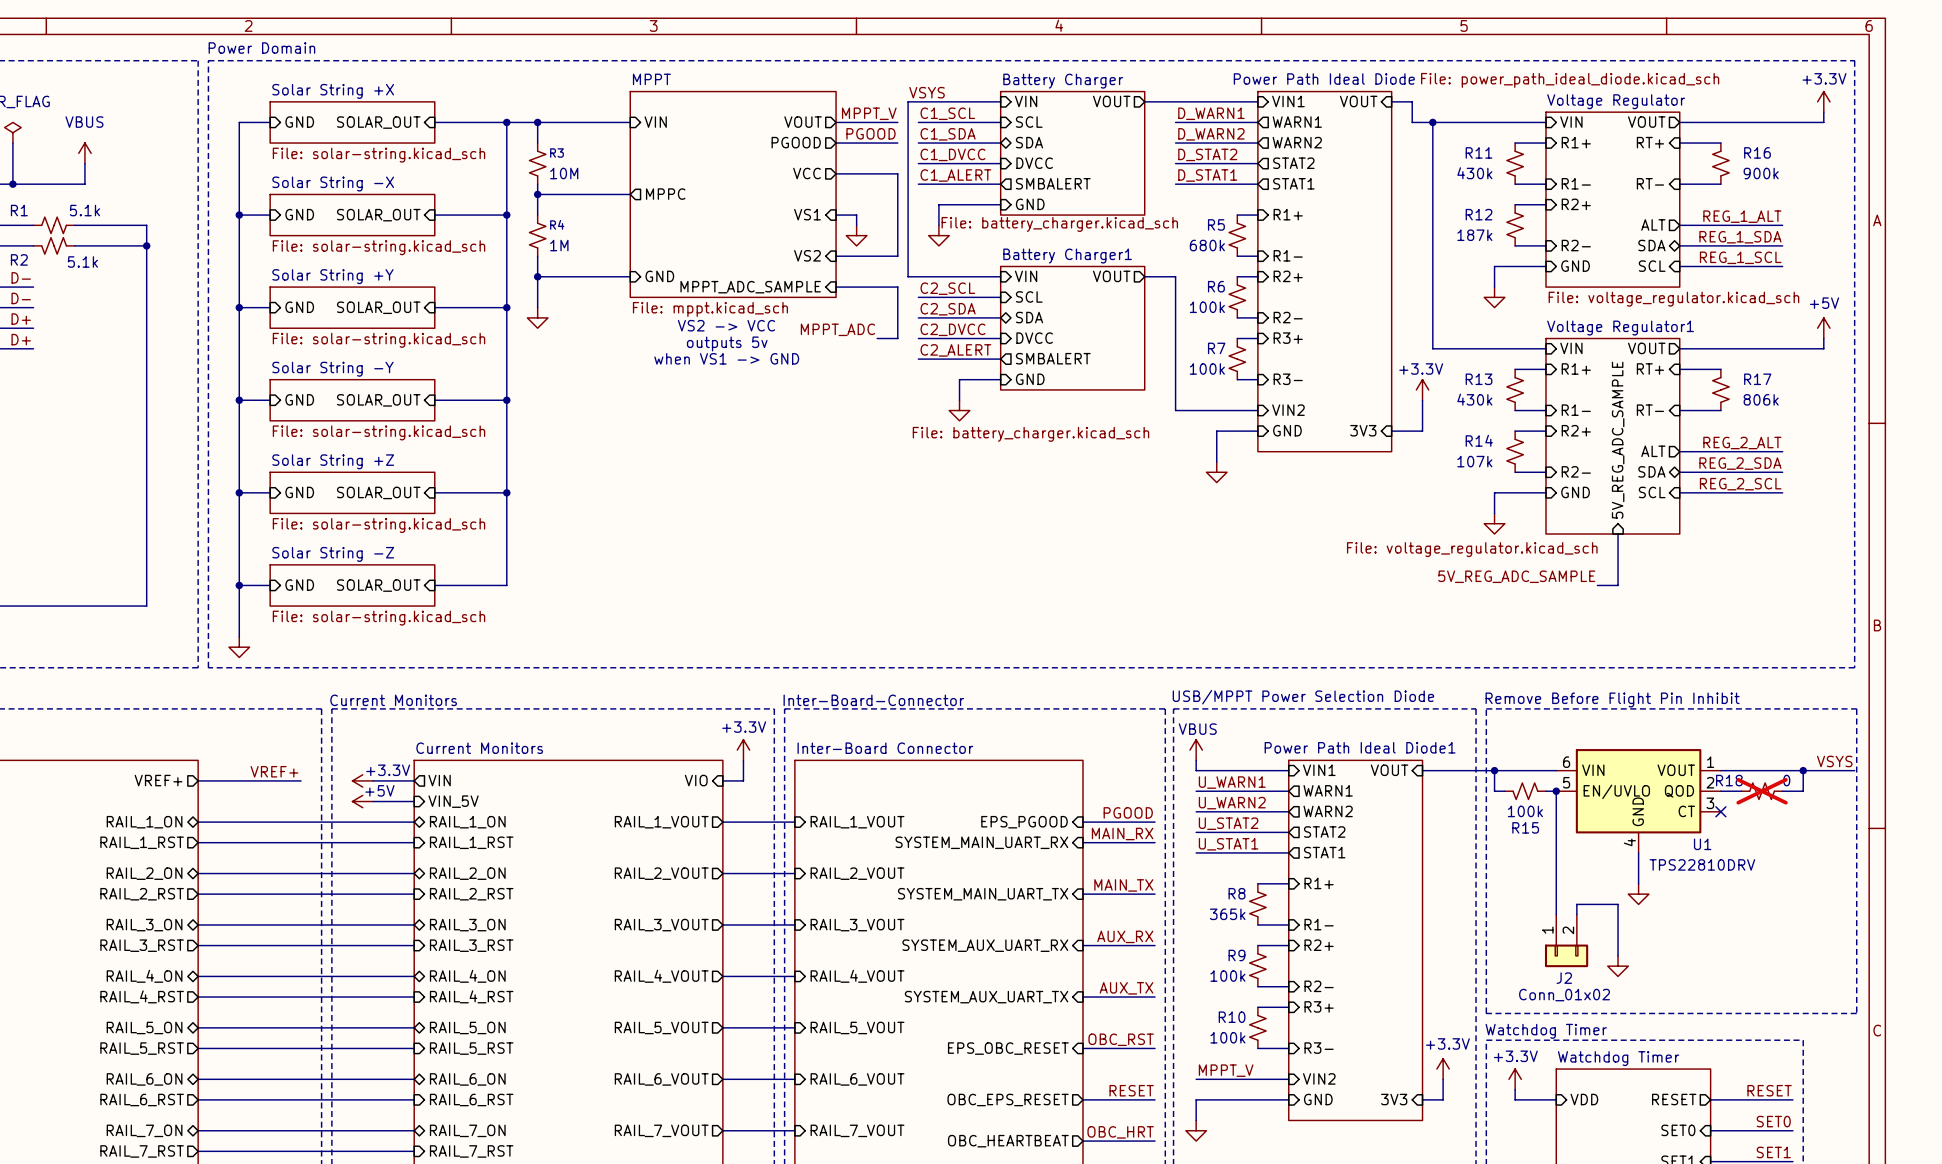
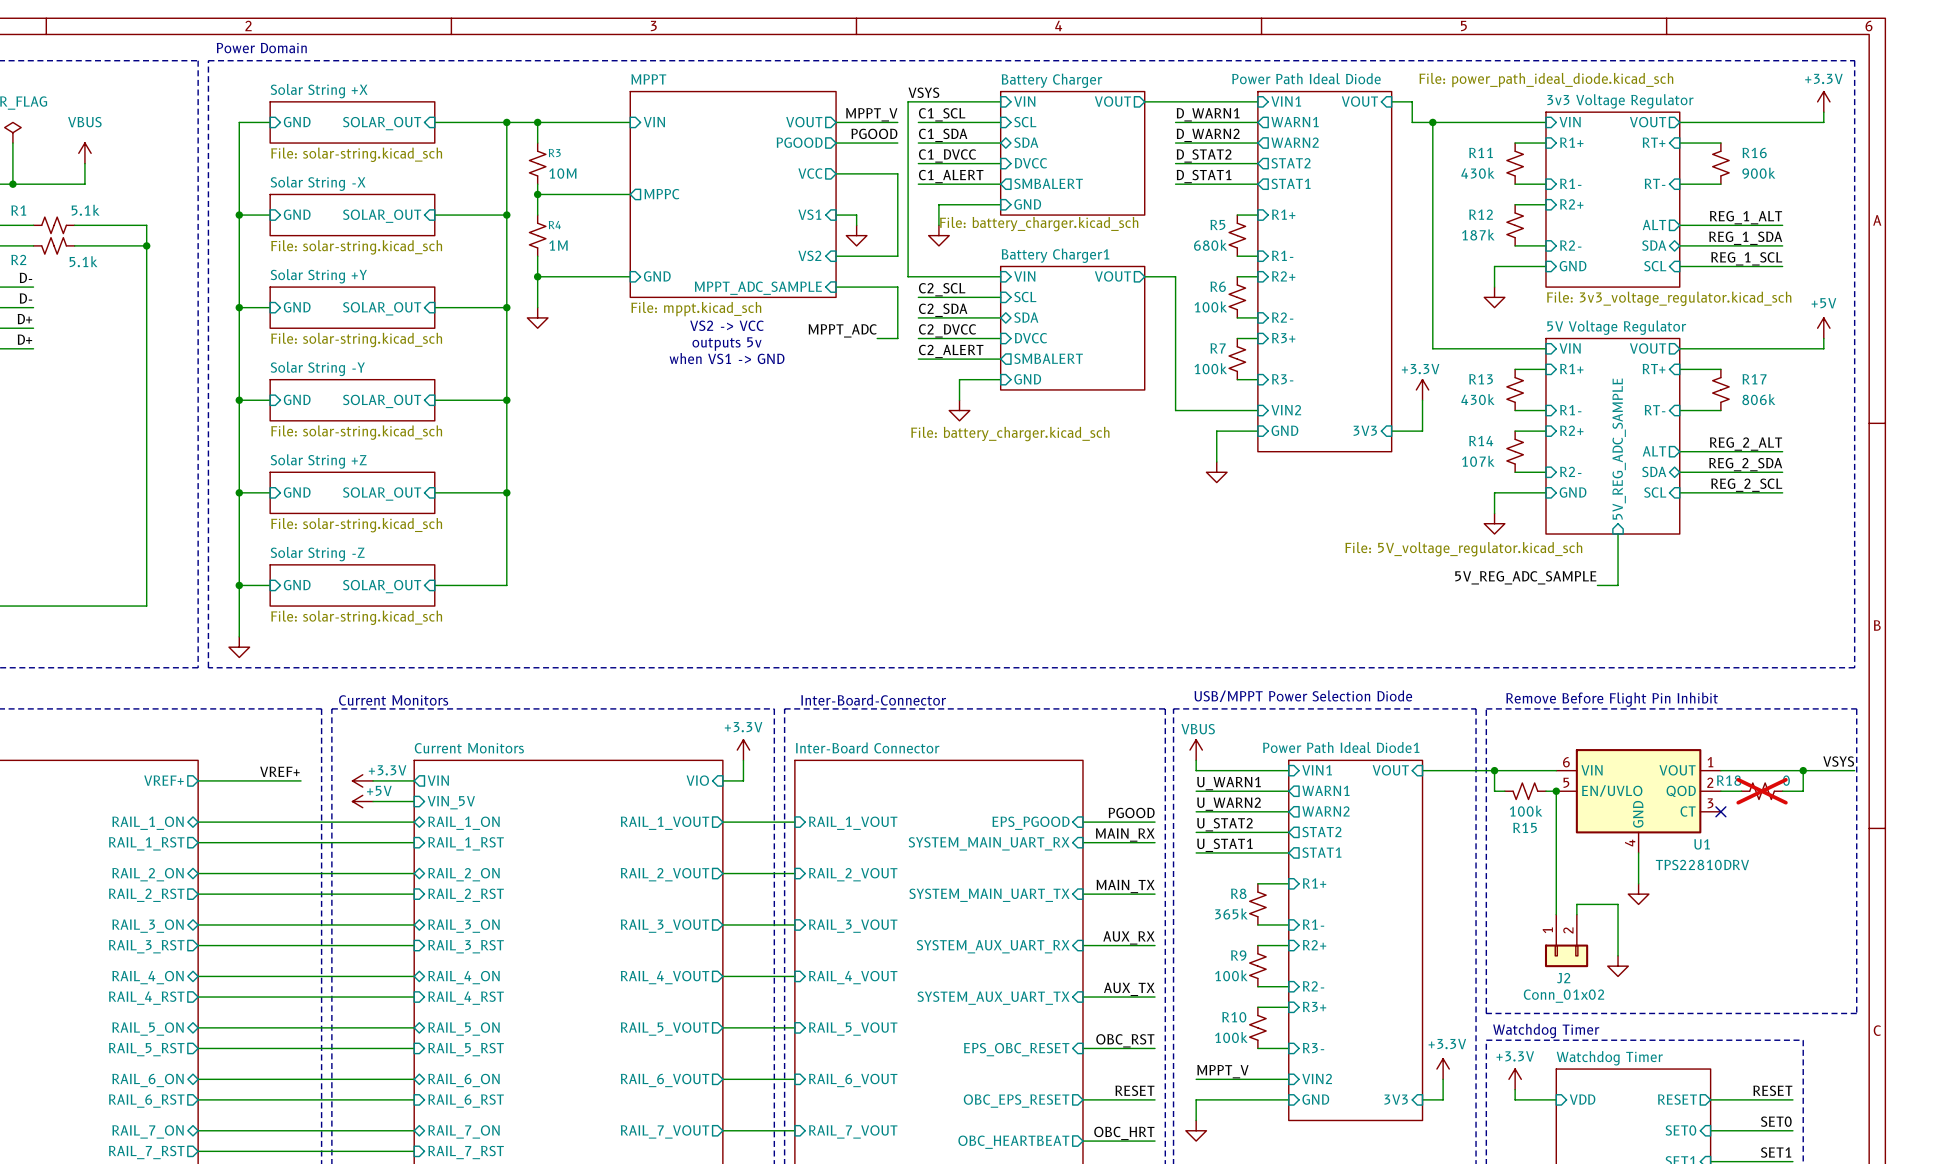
sheet Voltage Regulator name: Voltage Regulator (1616, 101) -> 3v3 Voltage Regulator (1620, 101)
sheet Voltage Regulator value: File: voltage_regulator.kicad_sch (1673, 299) -> File: 3v3_voltage_regulator.kicad_sch (1669, 298)
sheet Voltage Regulator1 name: Voltage Regulator1 (1620, 328) -> 5V Voltage Regulator (1616, 327)
sheet Voltage Regulator1 value: File: voltage_regulator.kicad_sch (1472, 549) -> File: 5V_voltage_regulator.kicad_sch (1463, 549)

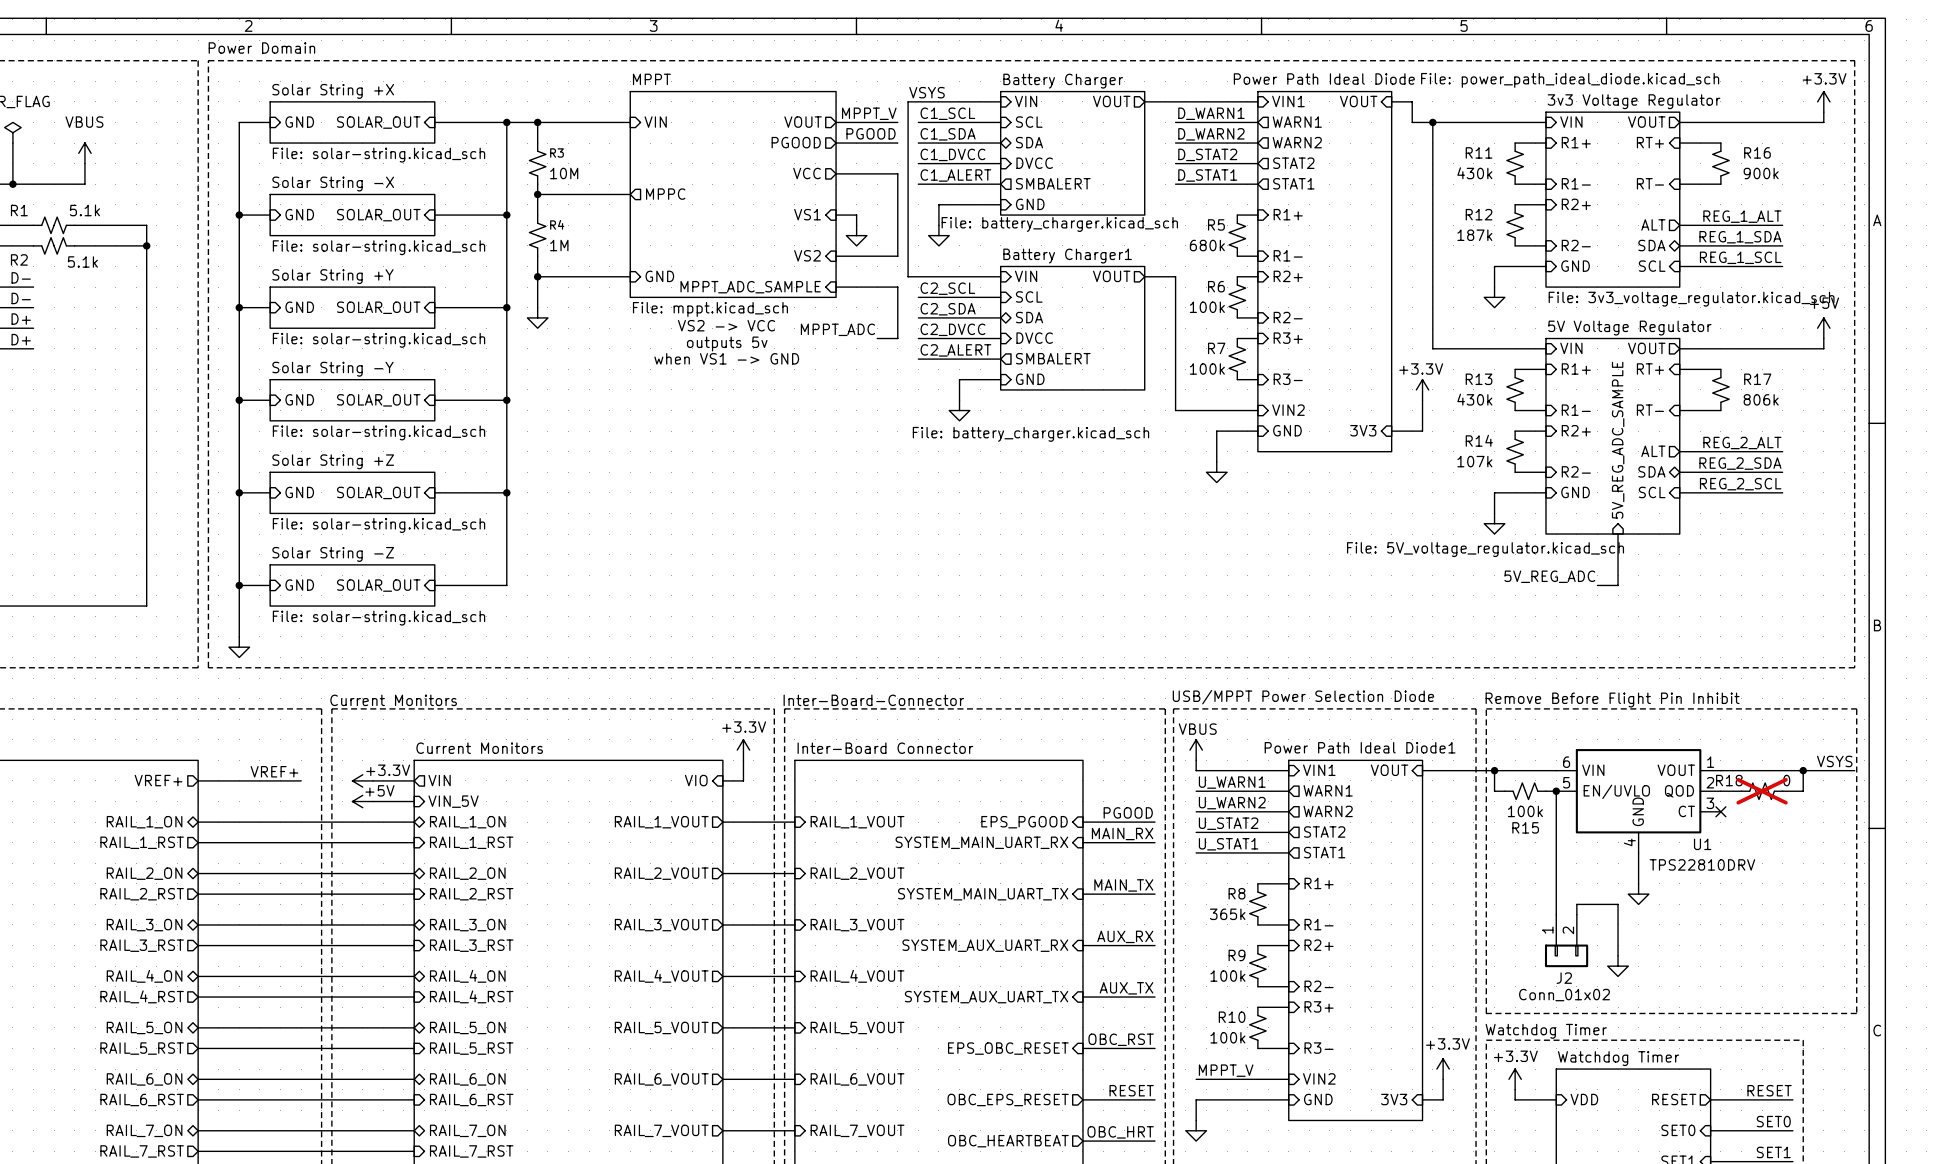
label: 5V_REG_ADC_SAMPLE (1525, 577) -> 5V_REG_ADC (1549, 576)

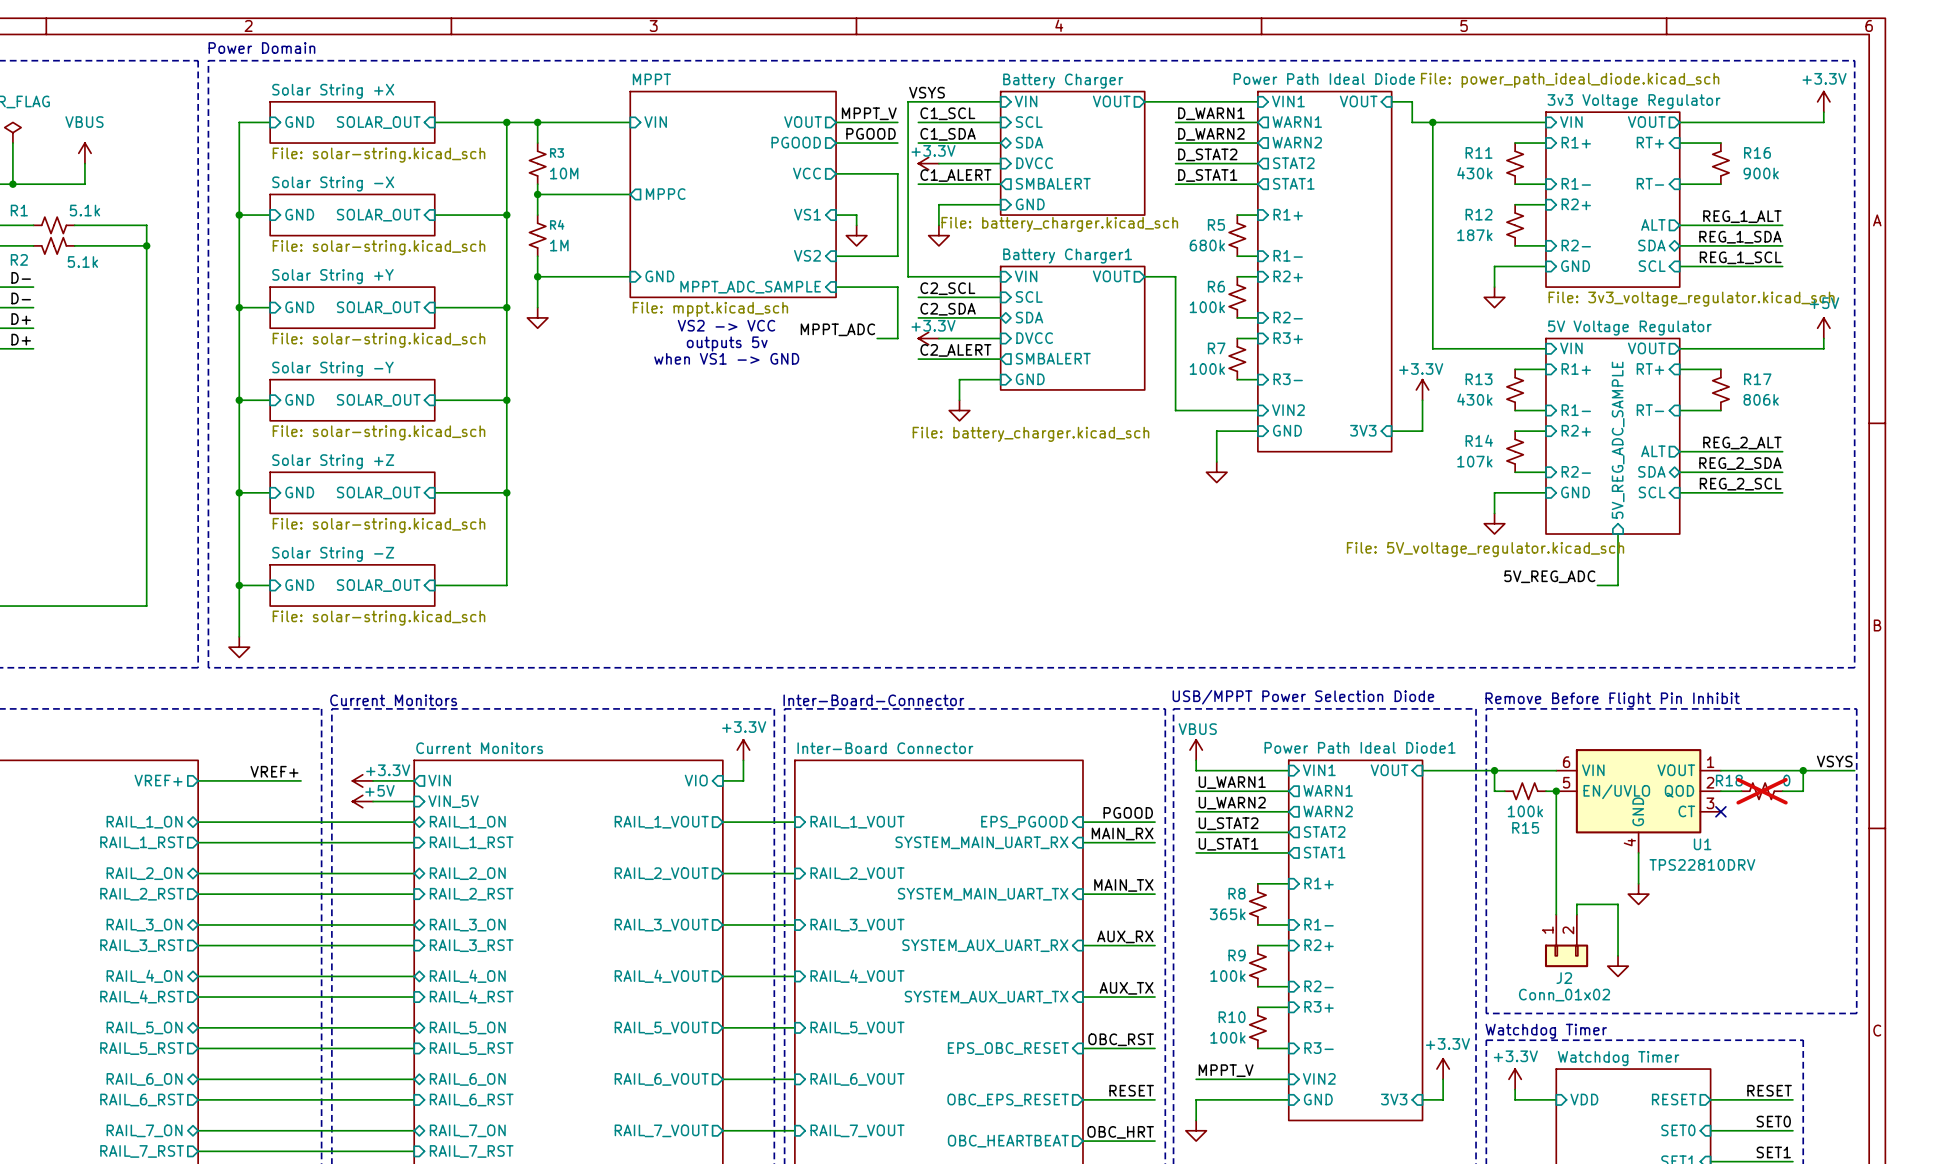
label: C1_DVCC (952, 154) -> none
power symbol: none -> +3.3V (928, 163)
label: C2_DVCC (952, 329) -> none
power symbol: none -> +3.3V (928, 338)

